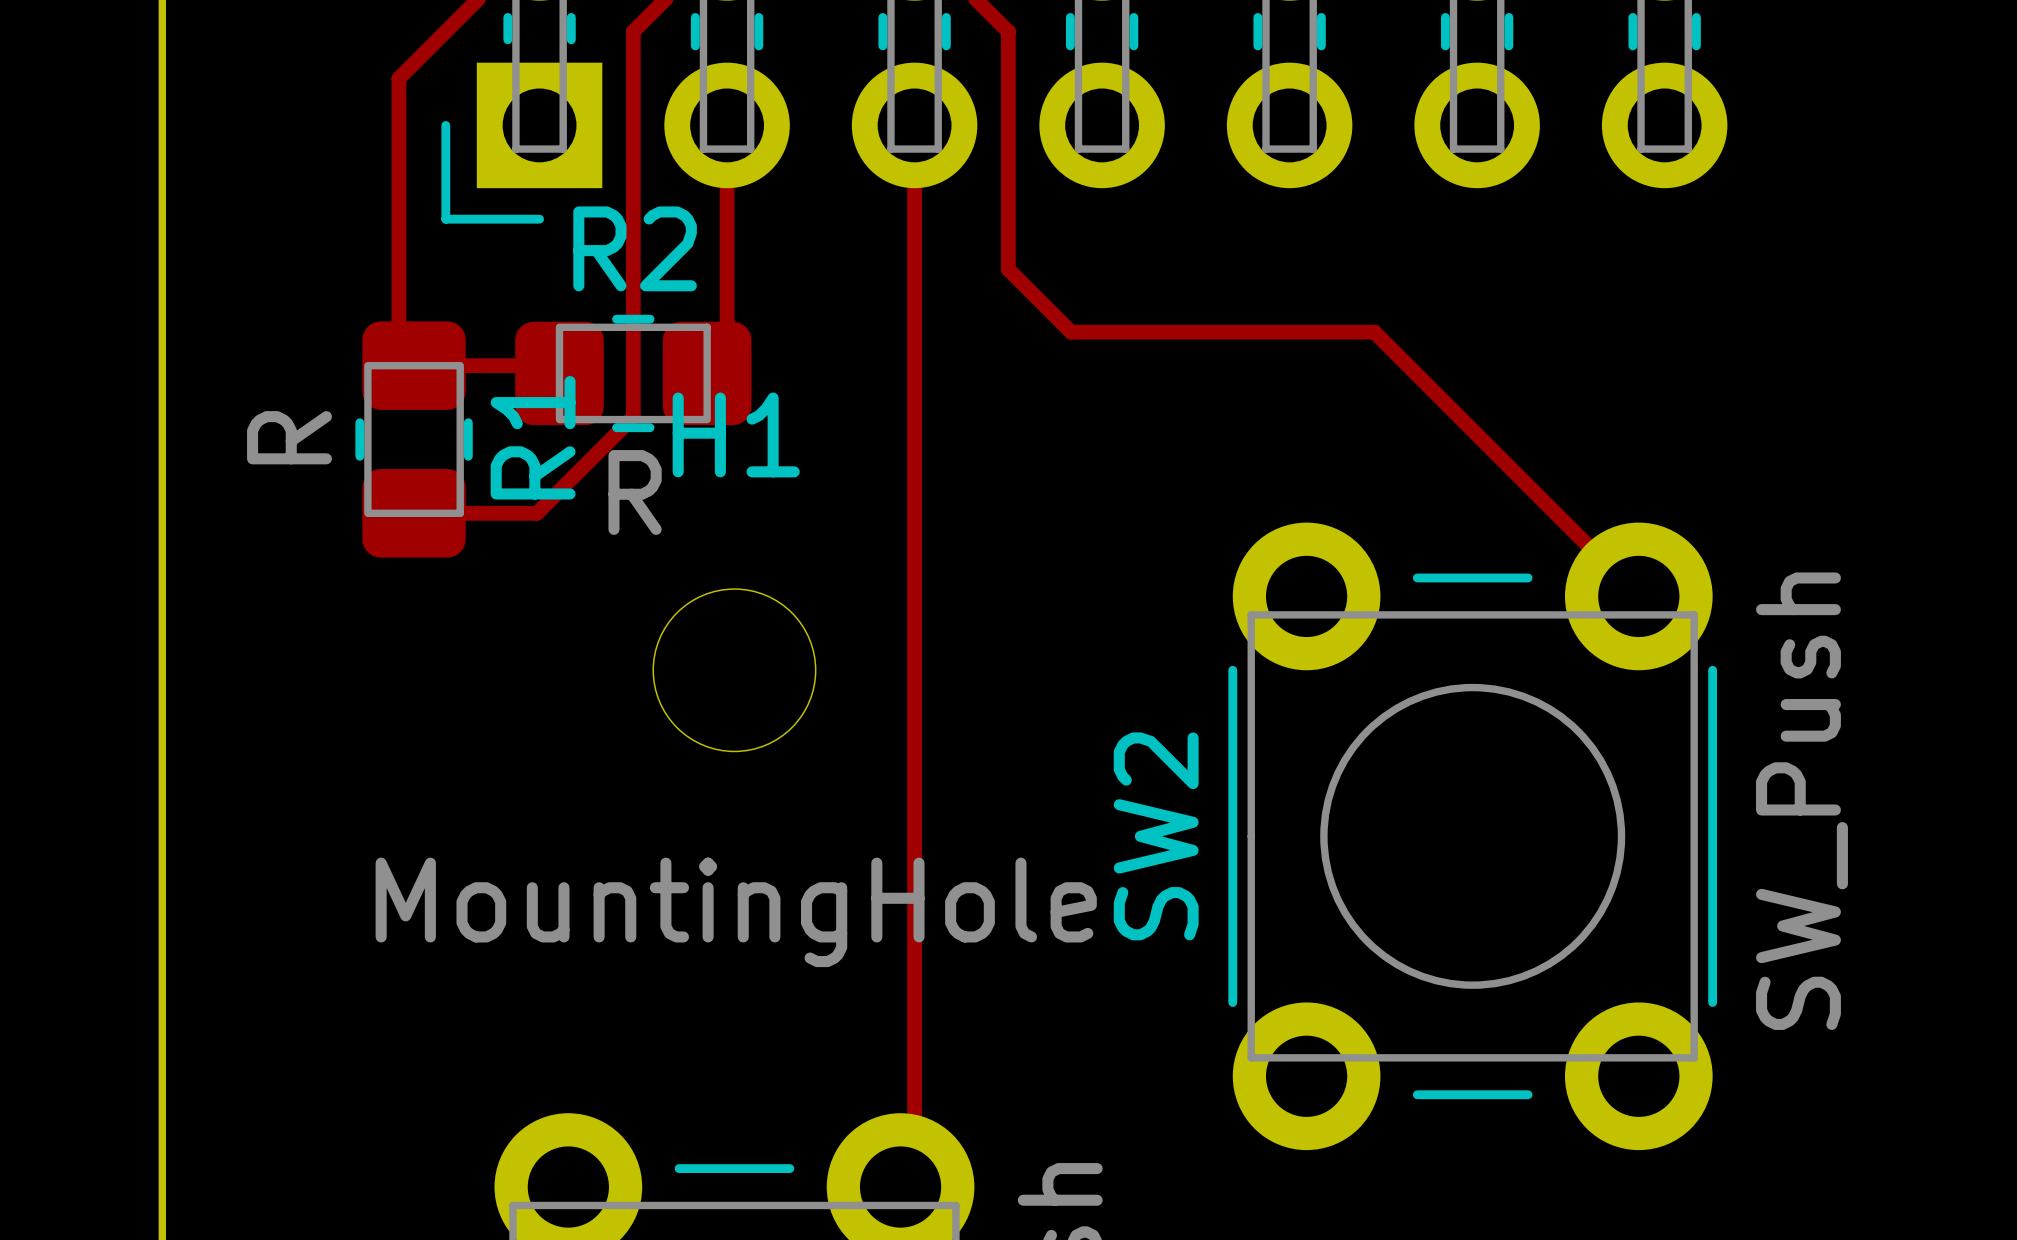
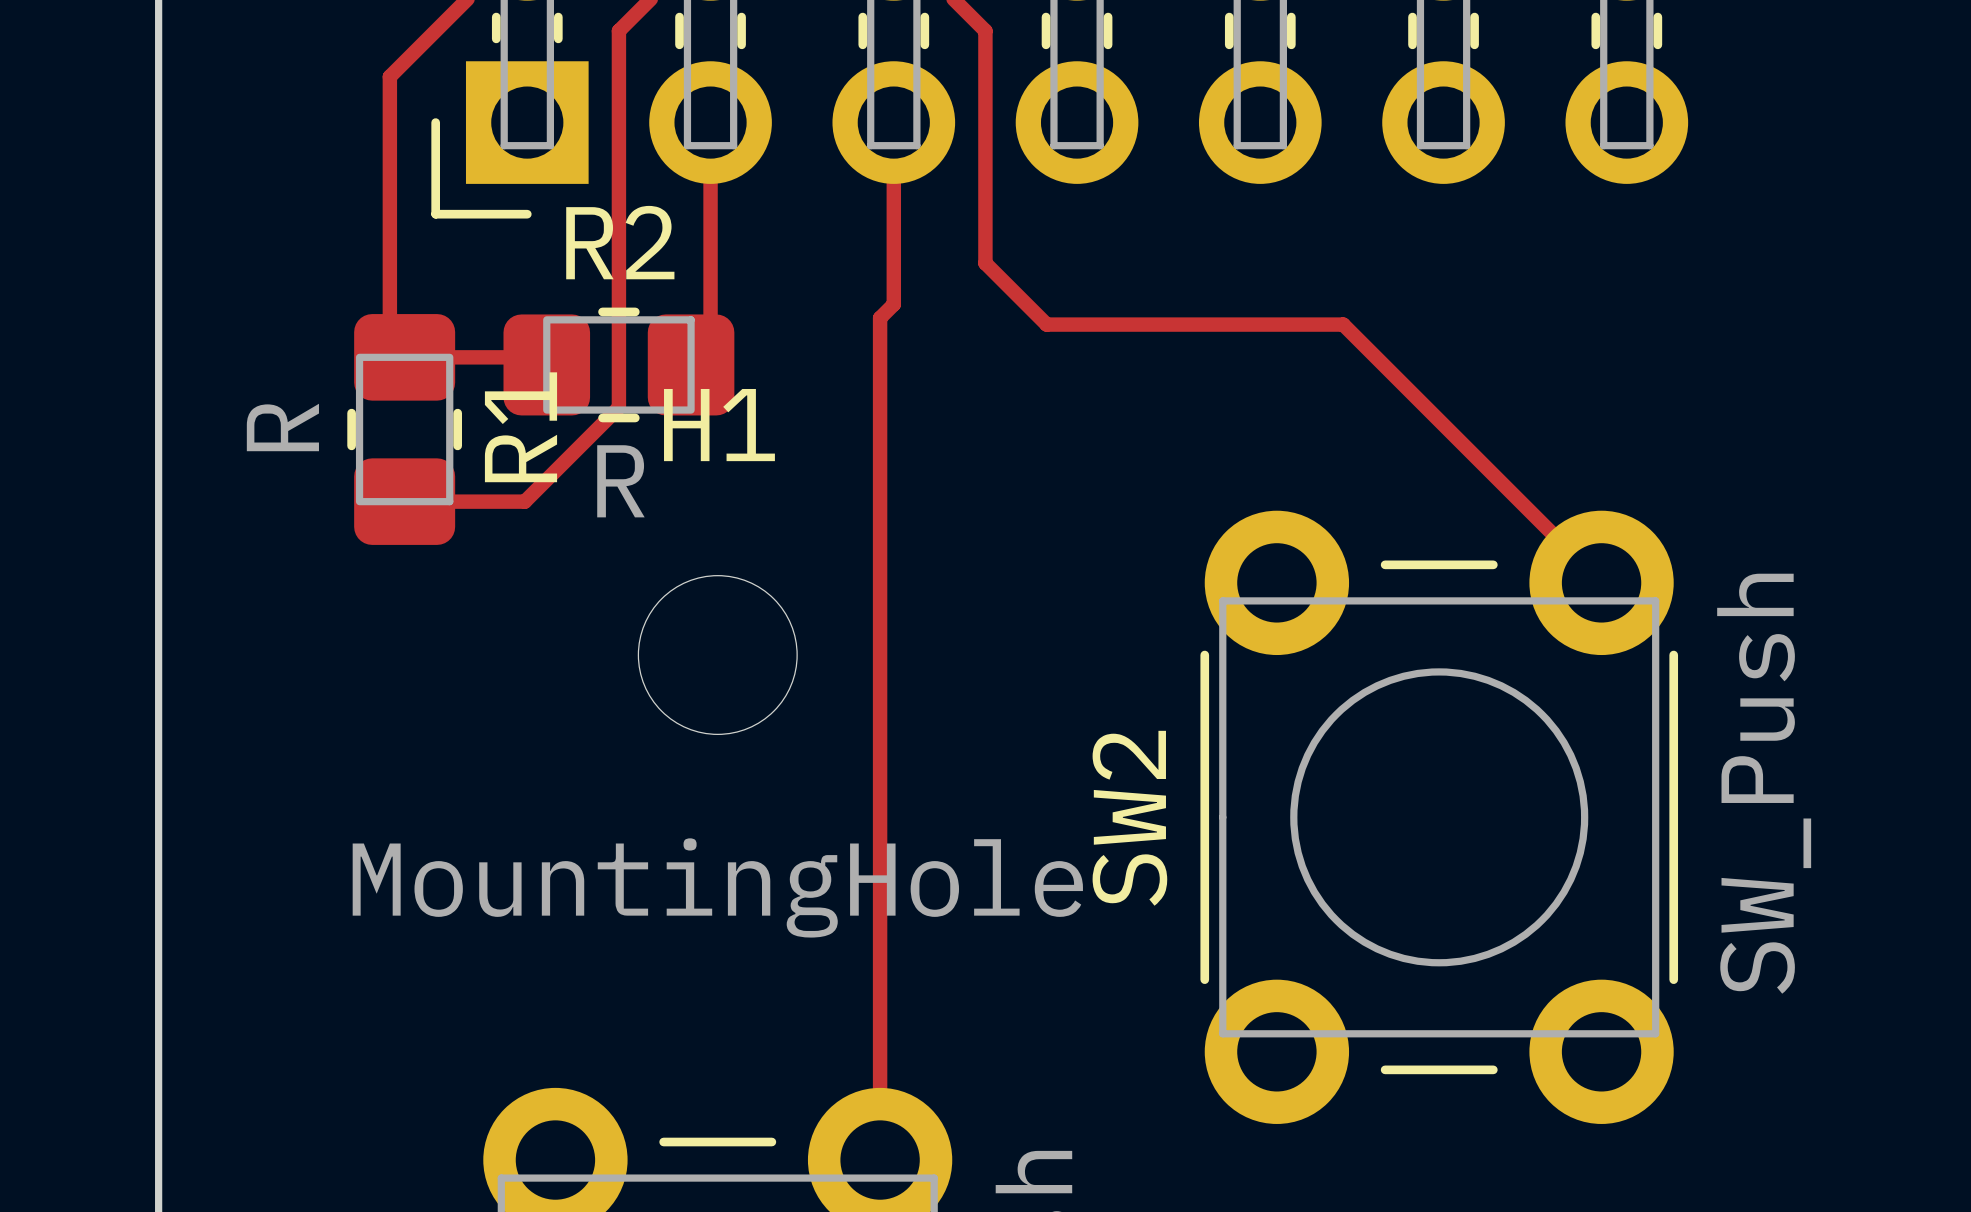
top track: (914, 311) (914, 1173) (900, 1187) -> (893, 304) (880, 318) (880, 1160)

